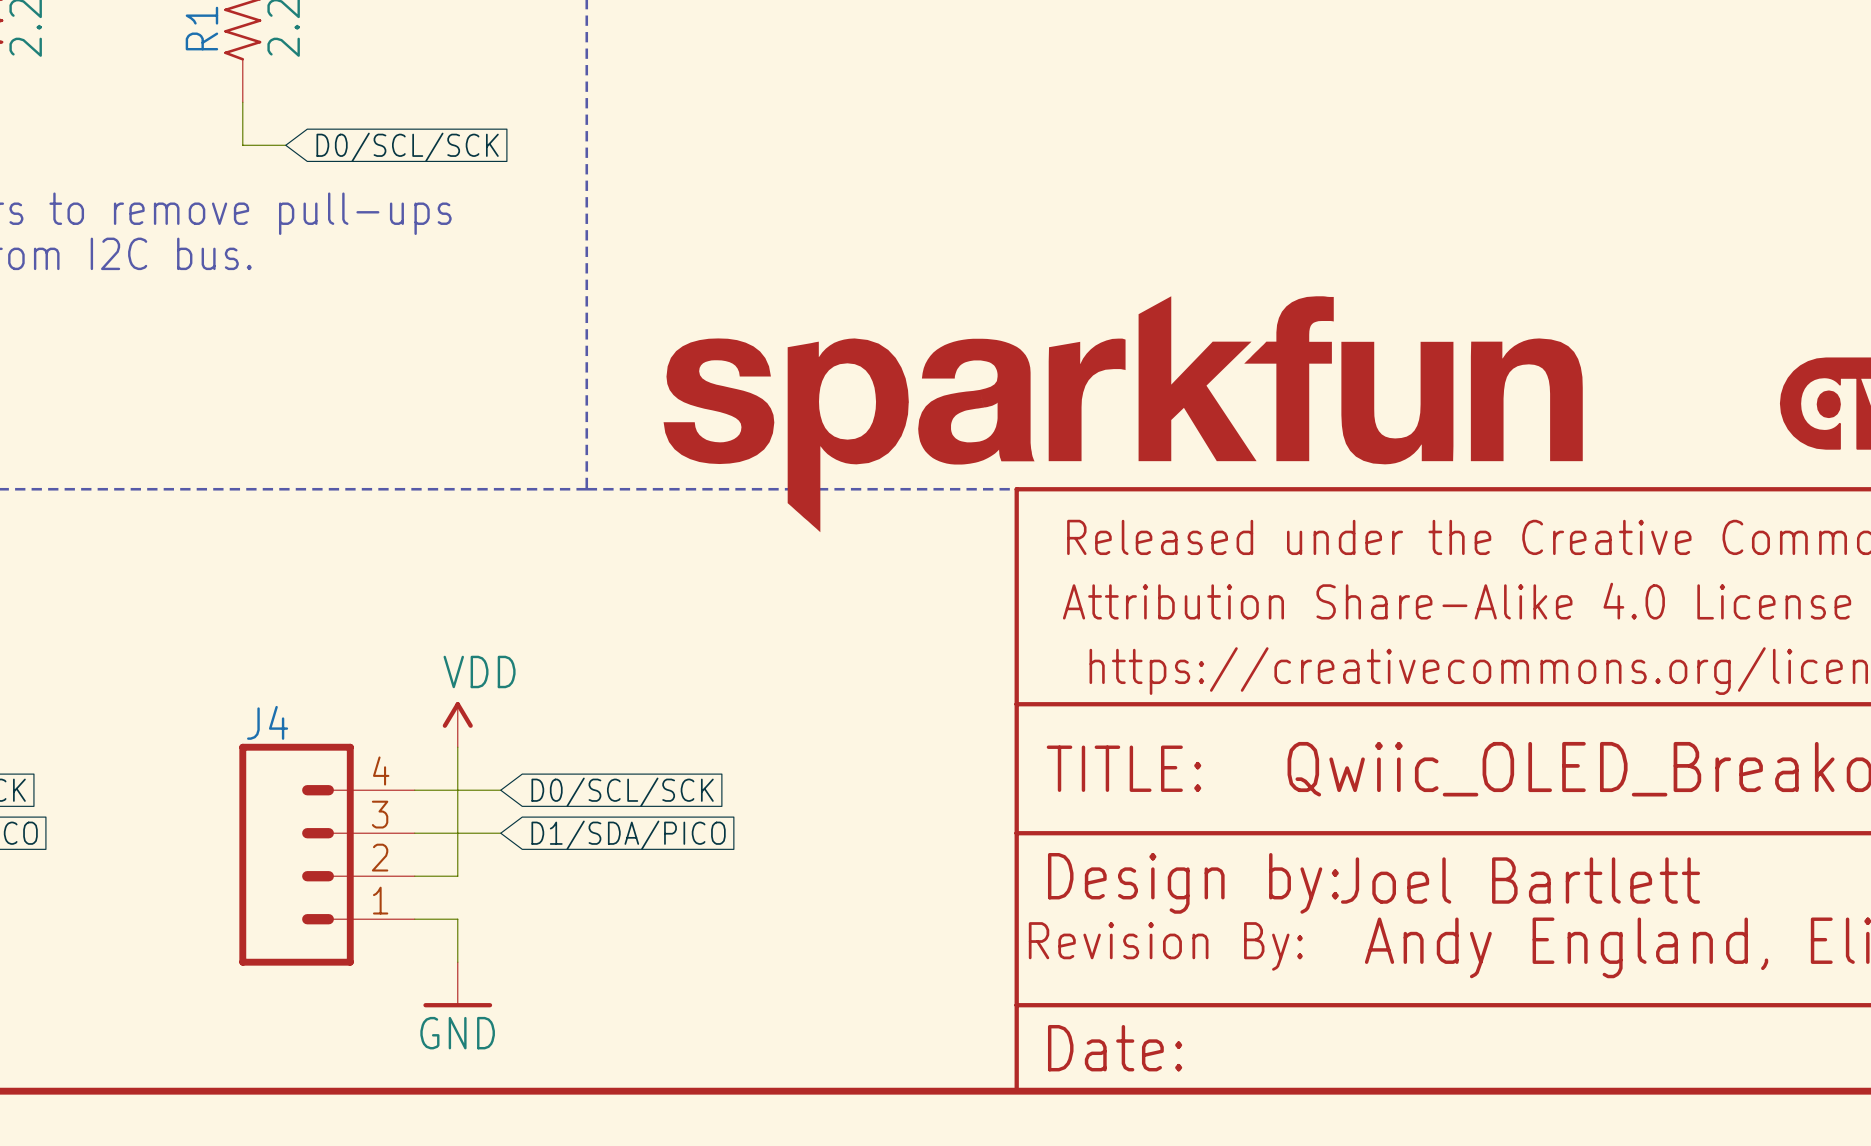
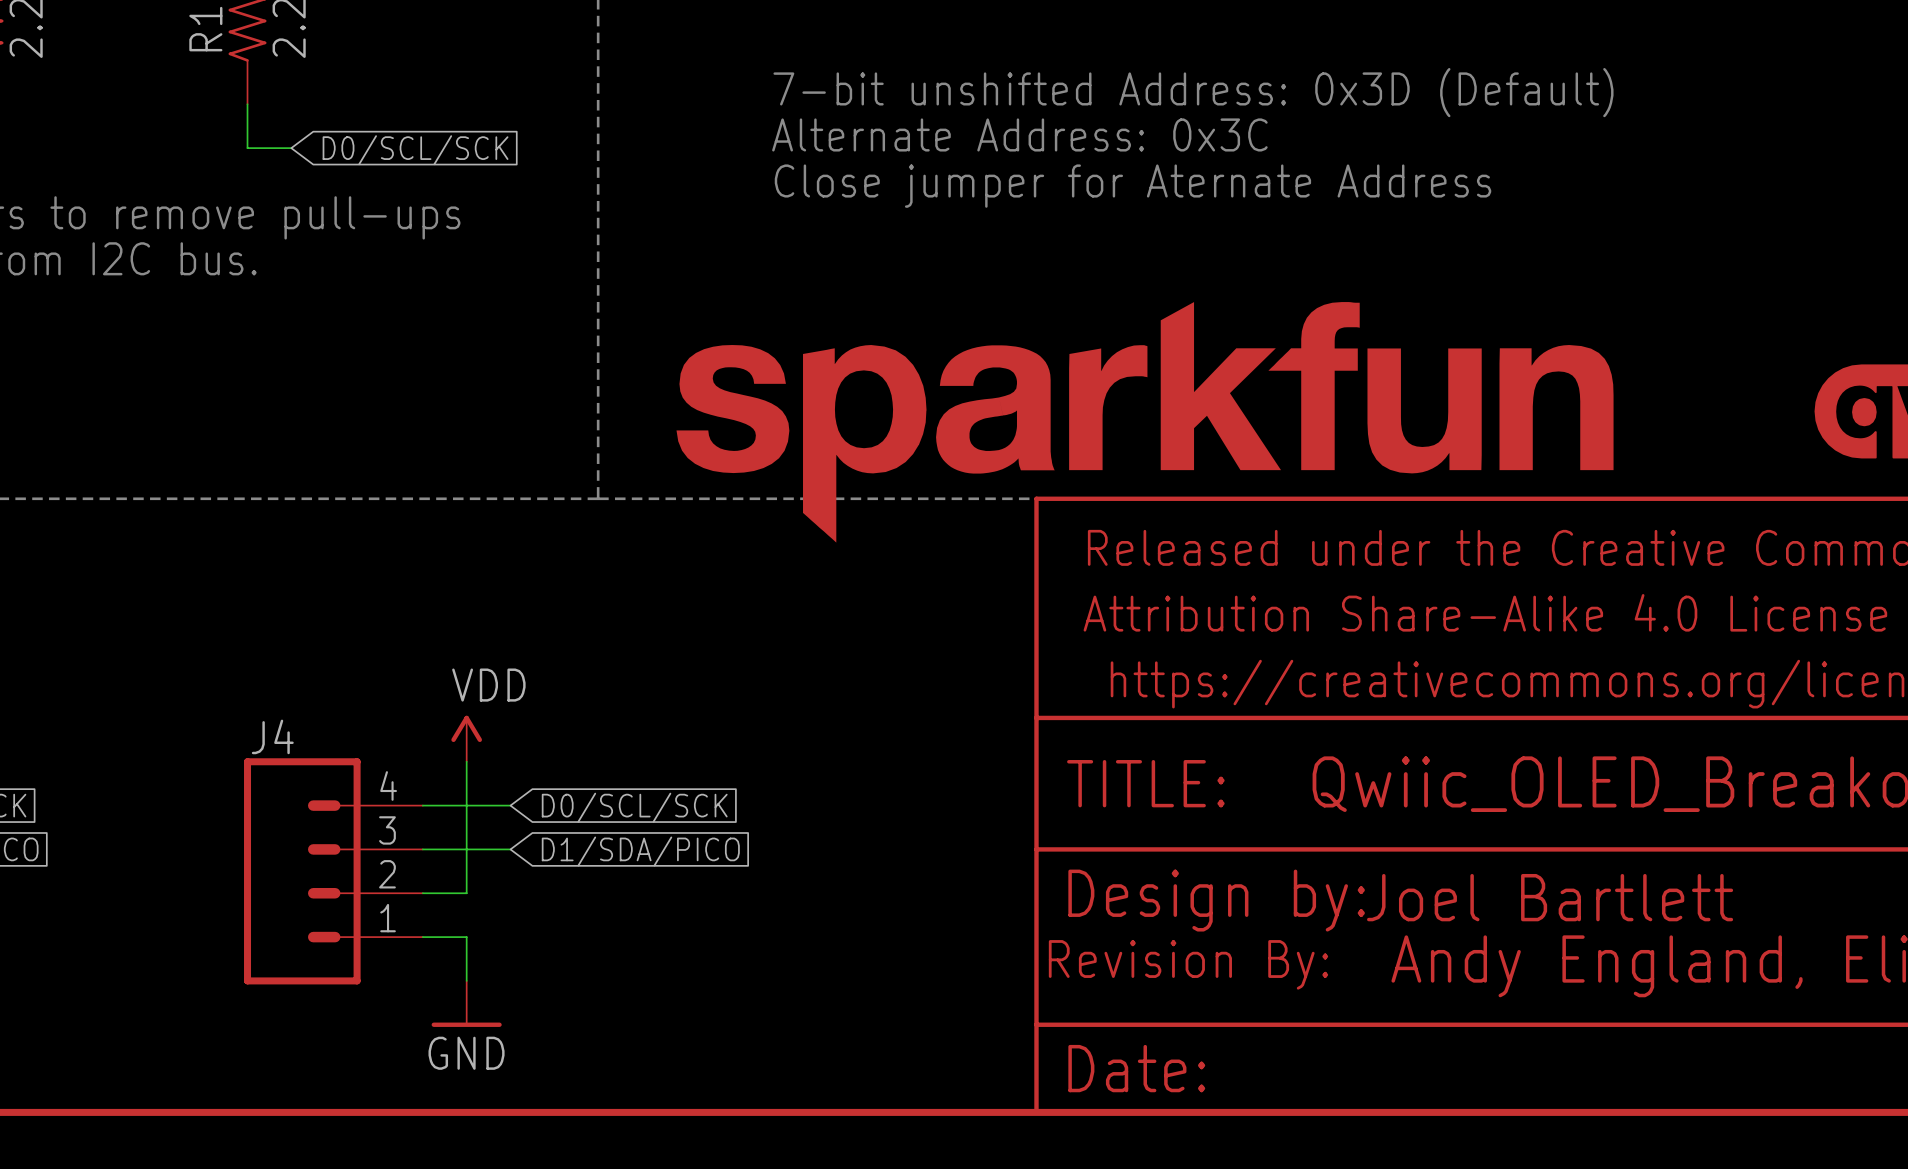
text: none -> 7-bit unshifted Address: 0x3D (Default) (1193, 92)
text: none -> Alternate Address: 0x3C (1019, 134)
text: none -> Close jumper for Aternate Address (1133, 186)

